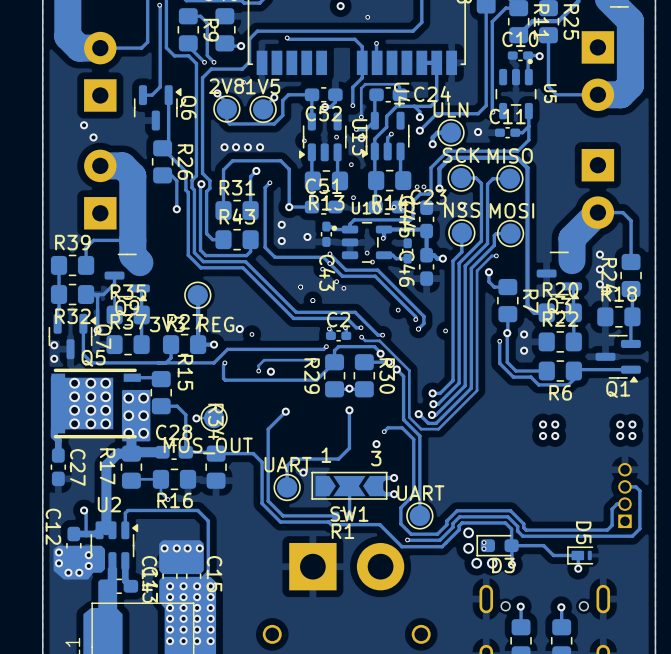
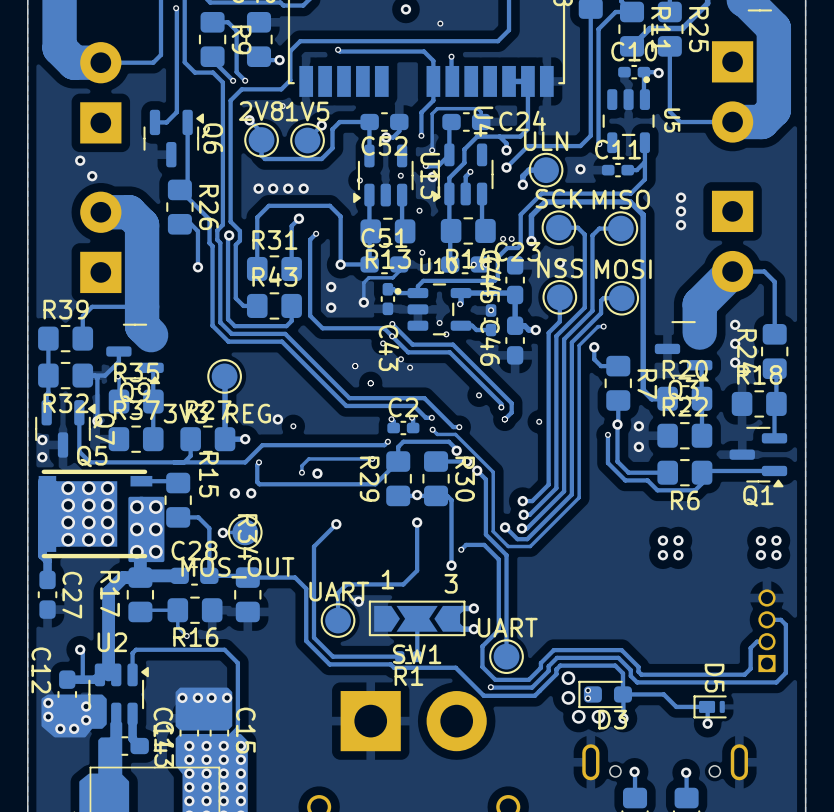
via: none -> (681, 197)
via: none -> (681, 211)
via: none -> (681, 225)
track: none -> (399, 264) (399, 271) (392, 277) (368, 277) (363, 282) (363, 302)
via: none -> (491, 310)
via: none -> (234, 493)
via: none -> (251, 493)
track: none -> (436, 495) (447, 495) (451, 500) (451, 565)

